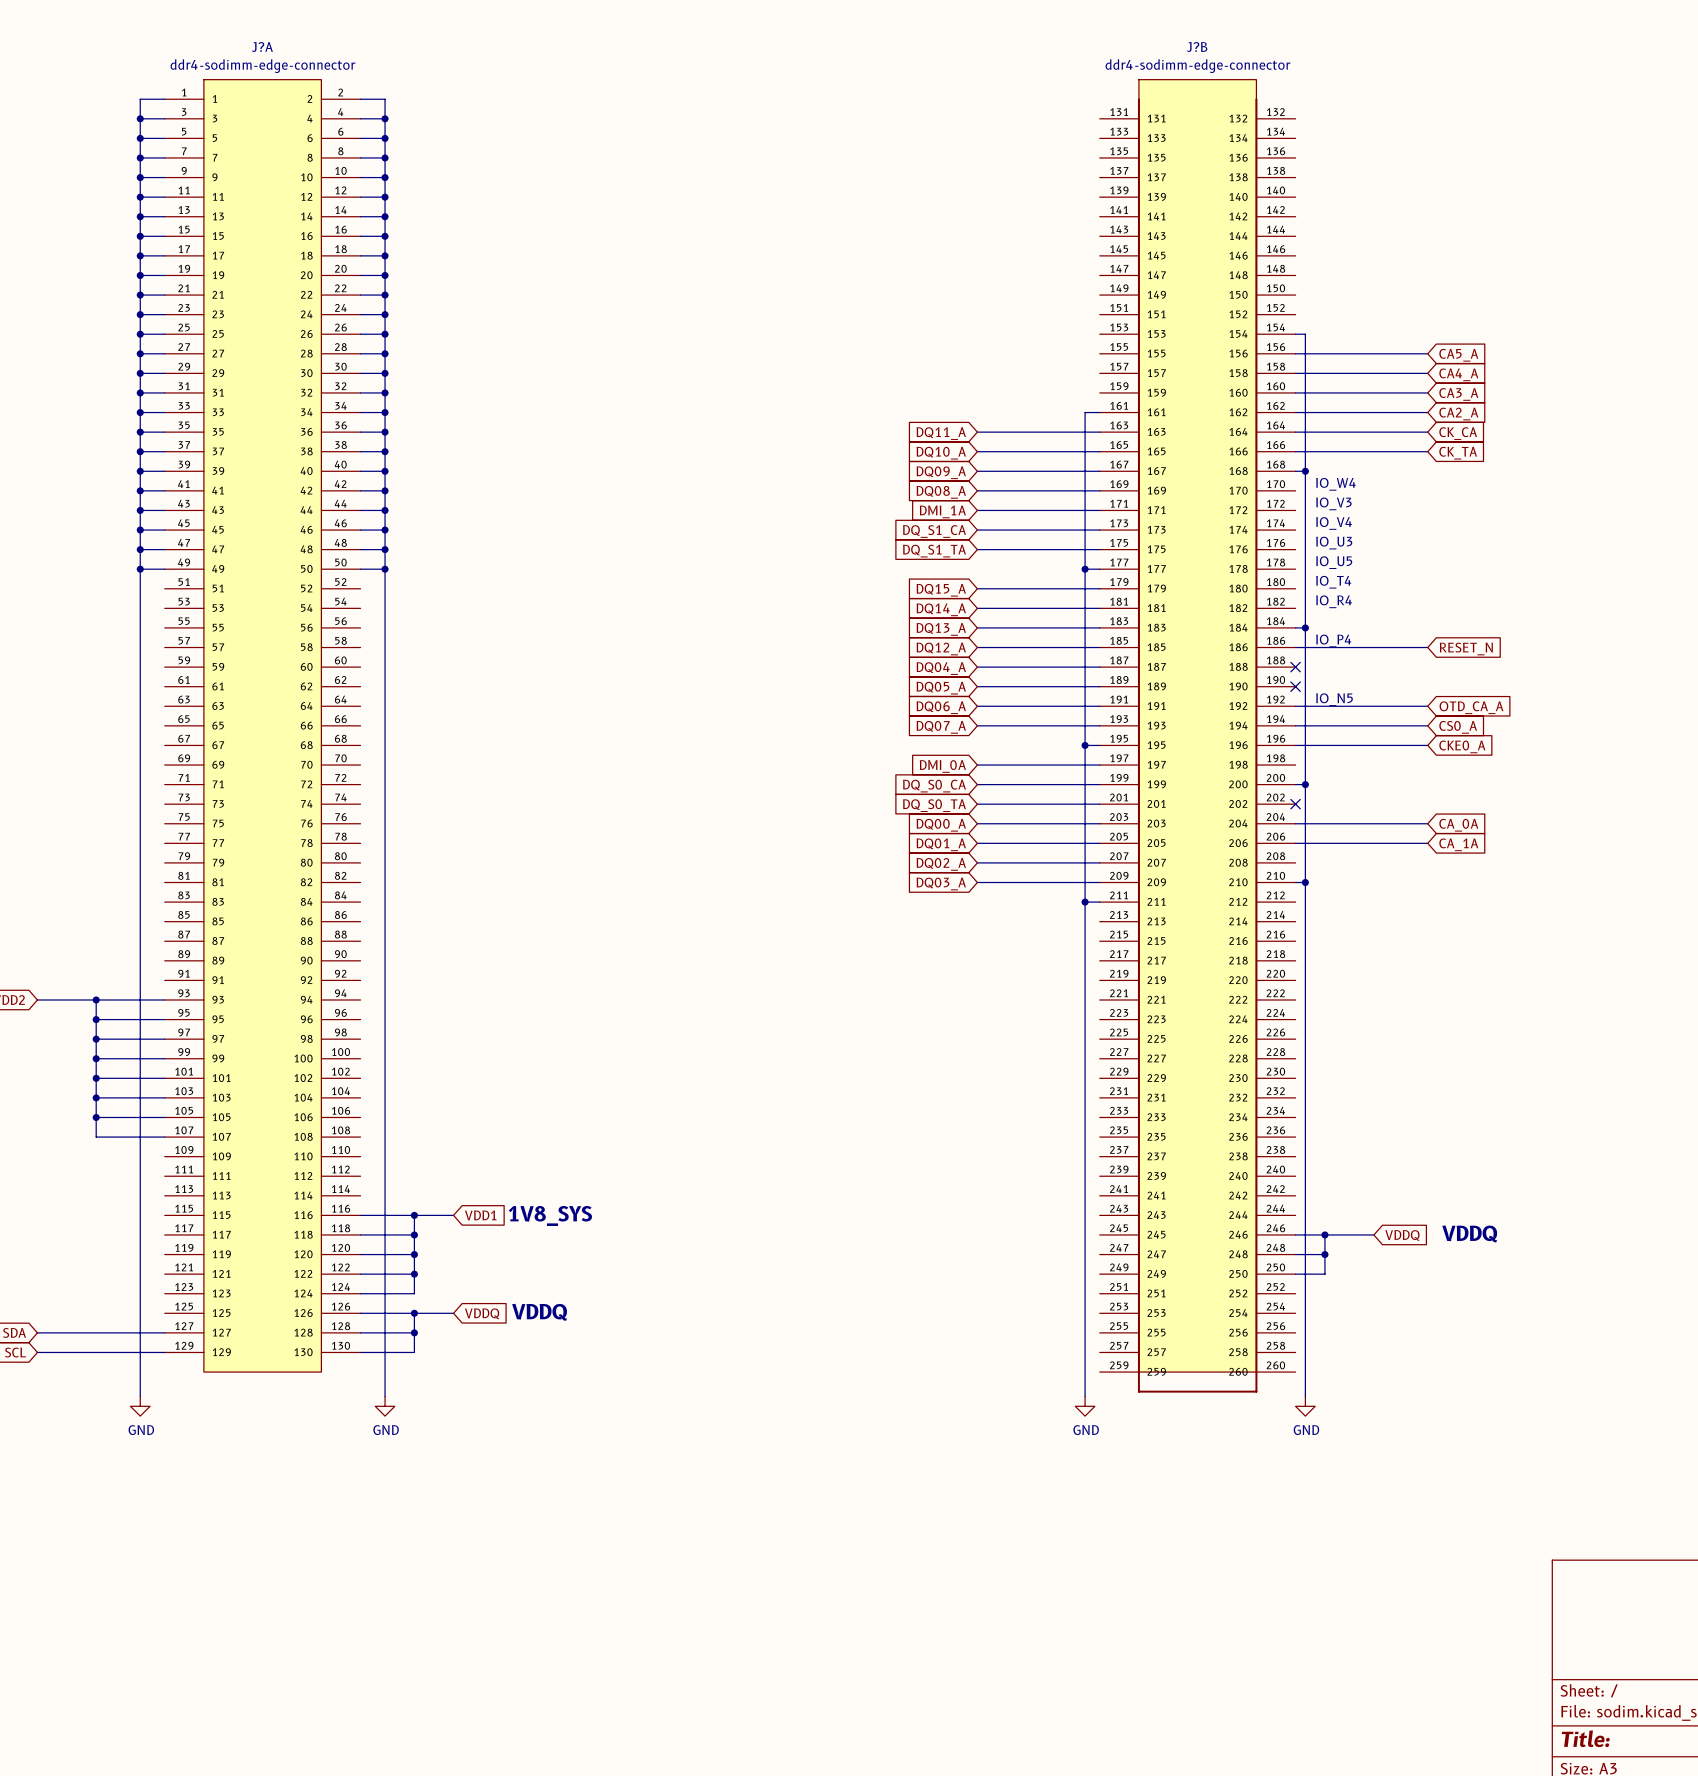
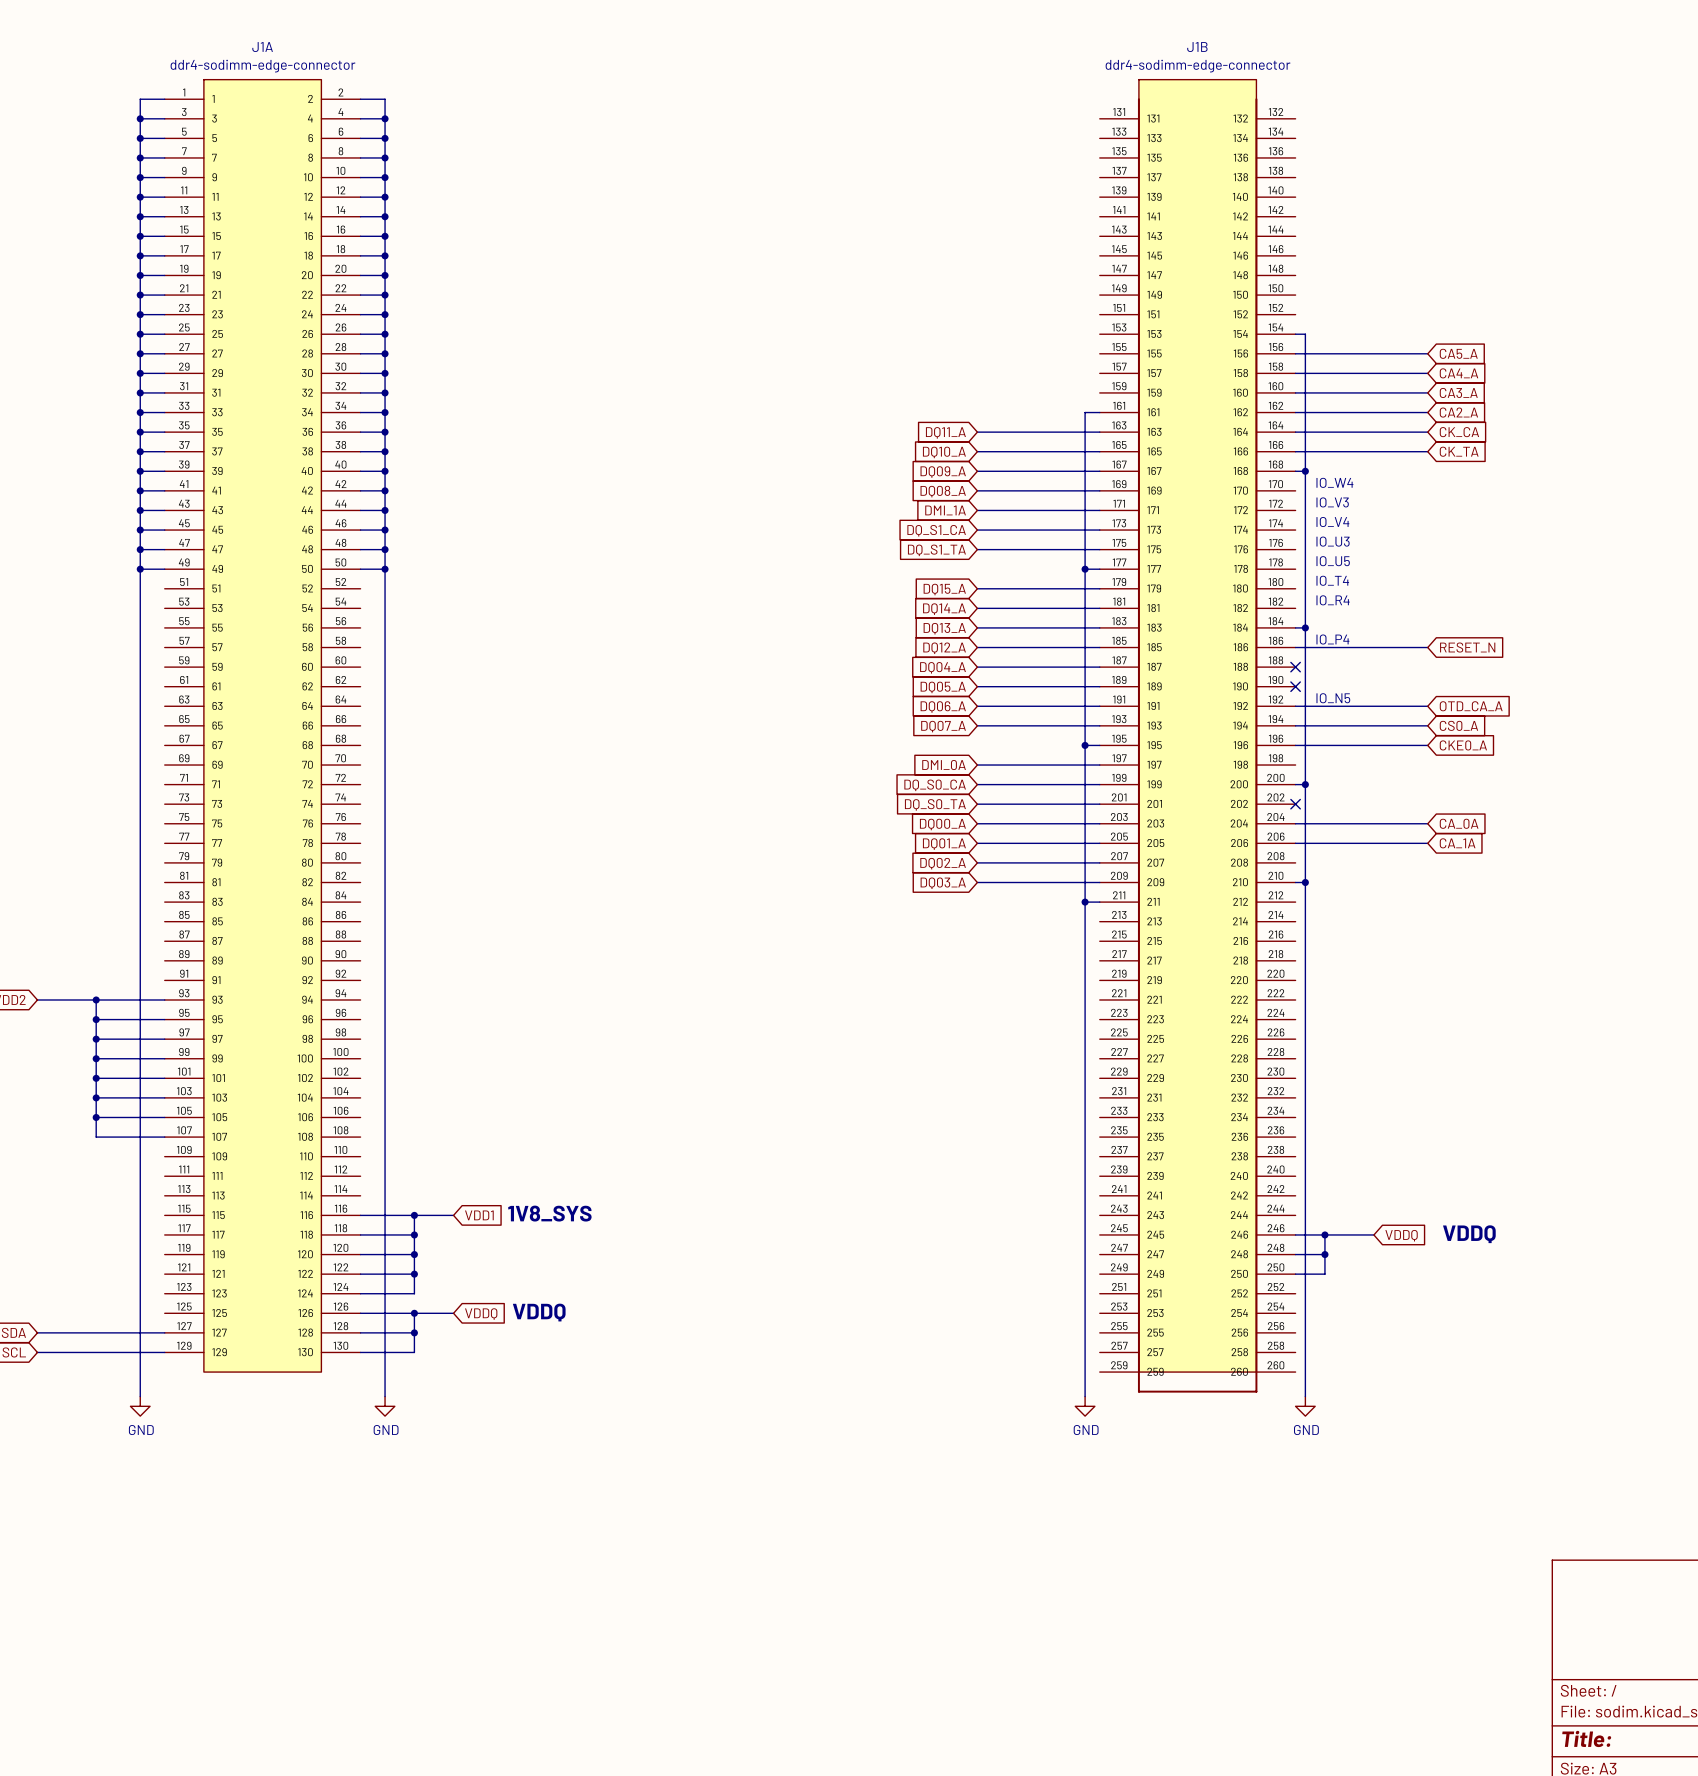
J?A name: J?A (262, 47) -> J1A (262, 47)
J?B name: J?B (1197, 47) -> J1B (1197, 47)

